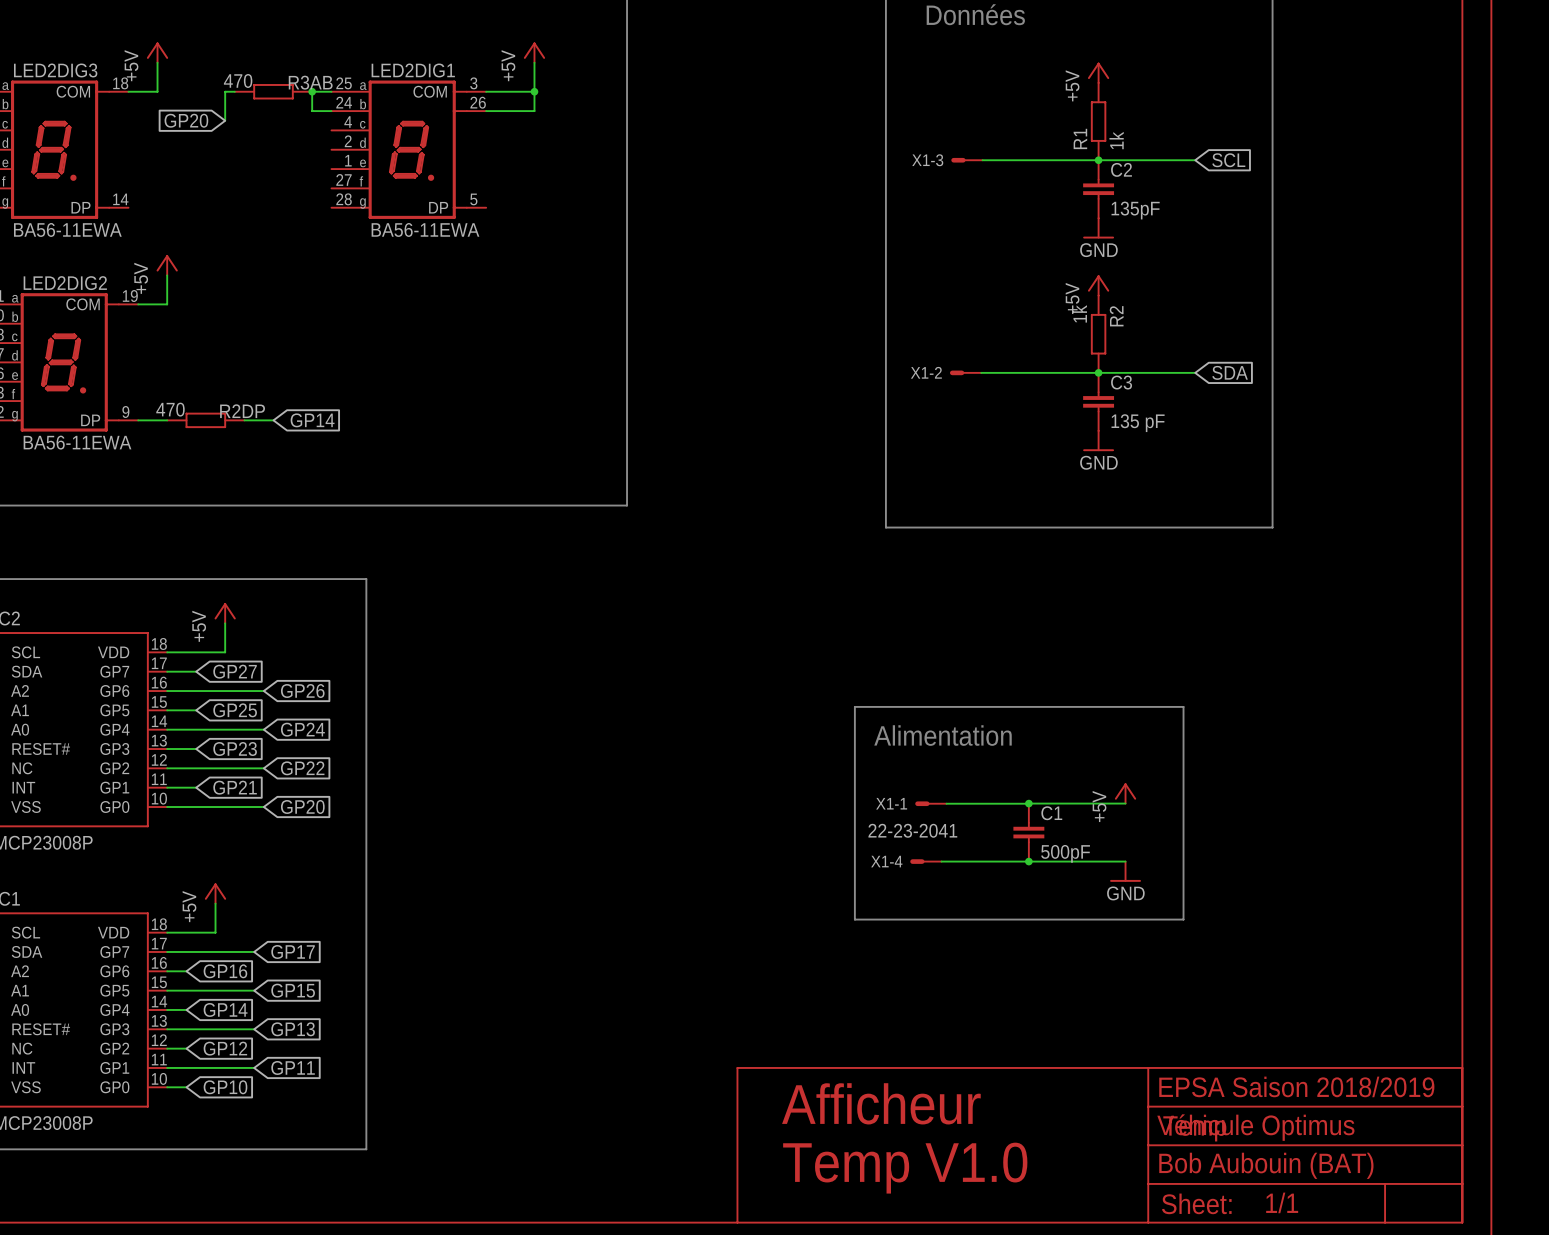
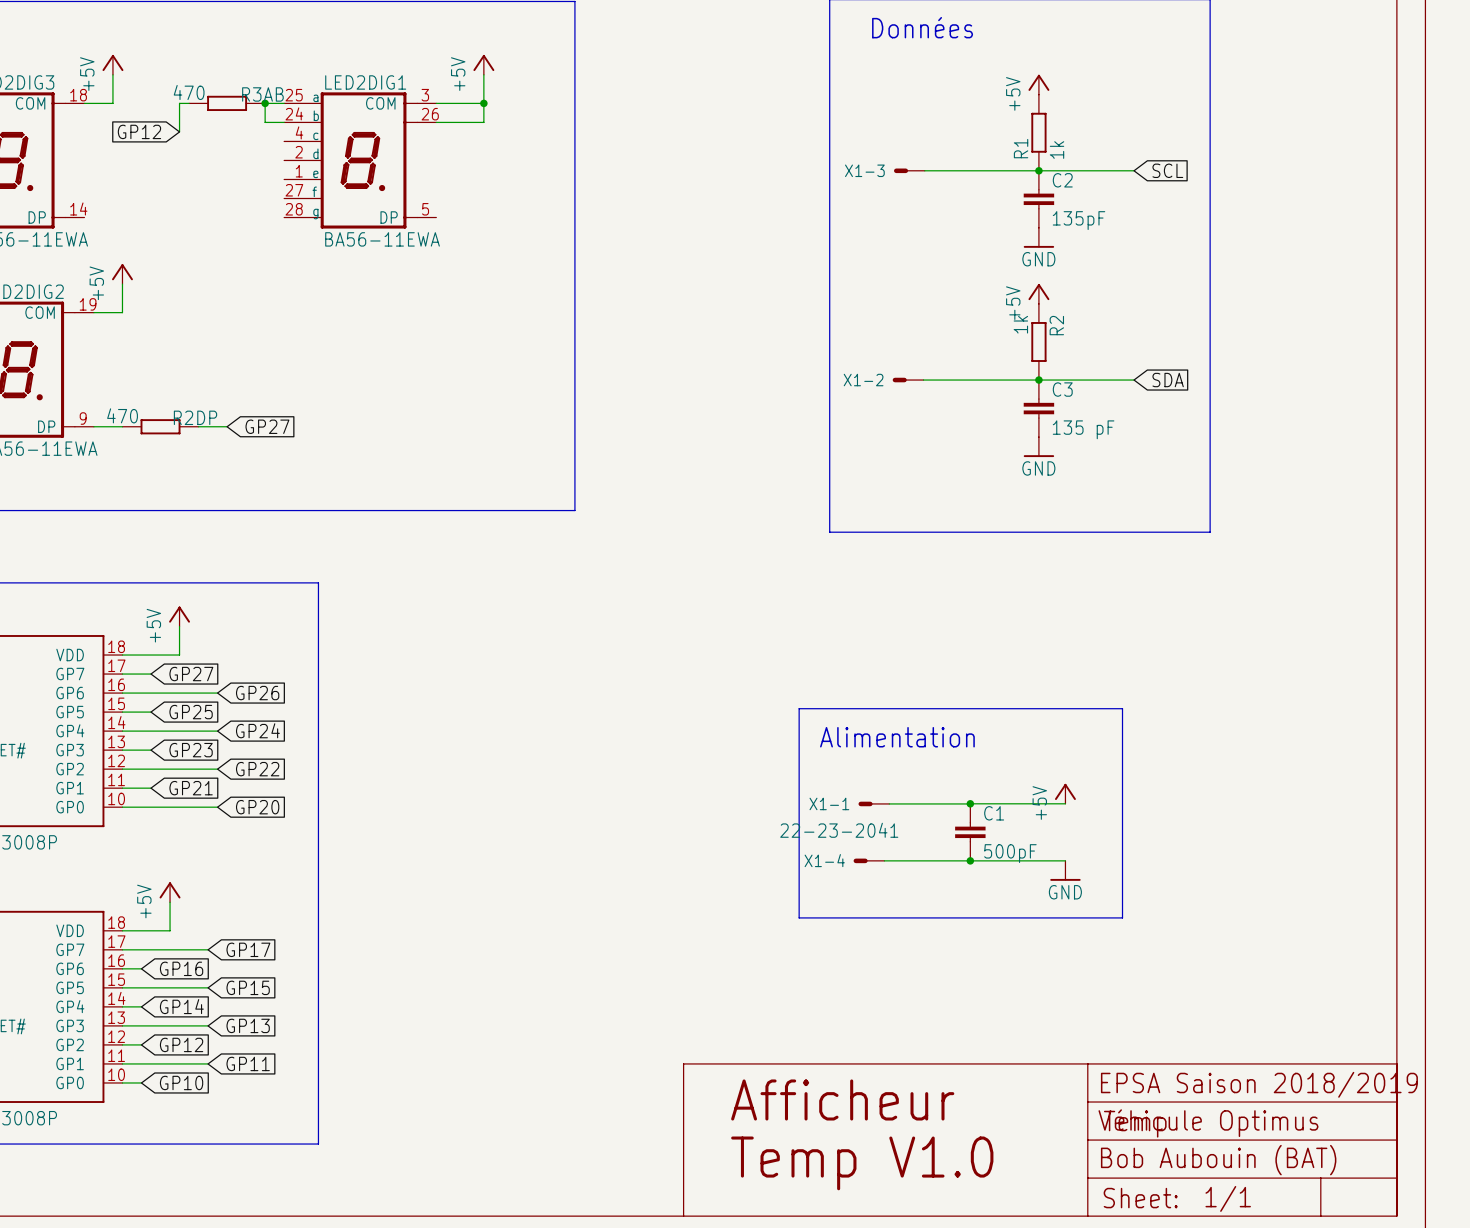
global label: GP20 (186, 120) -> GP12 (139, 131)
global label: GP14 (312, 420) -> GP27 (267, 426)

